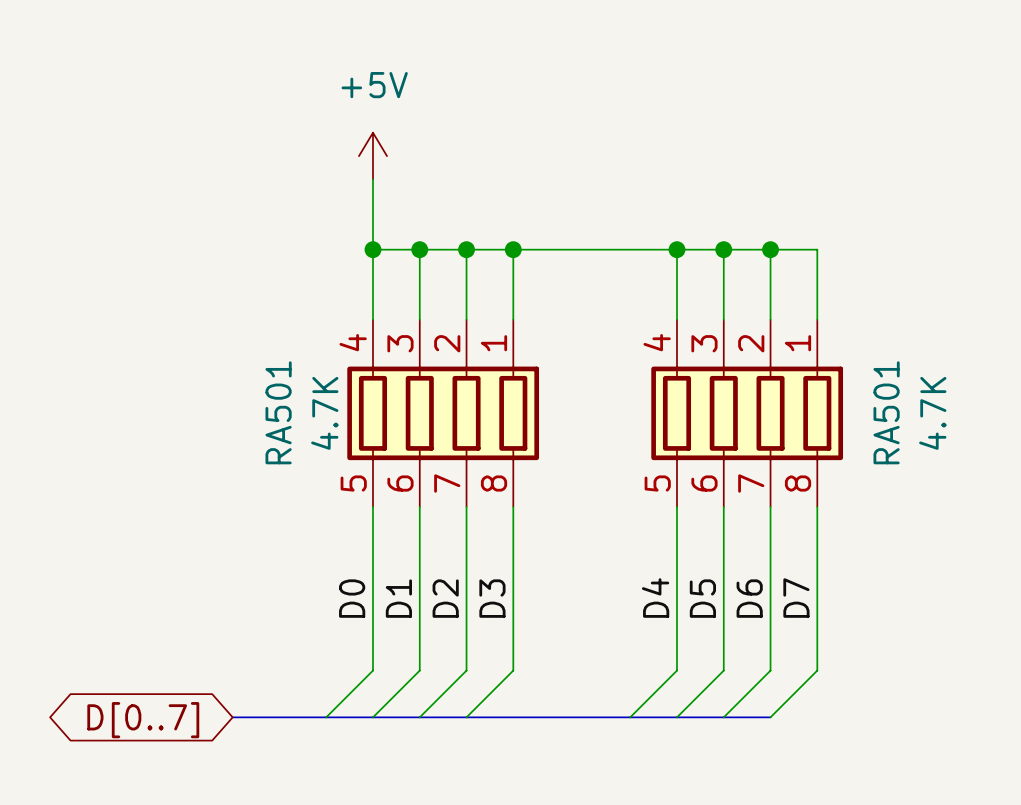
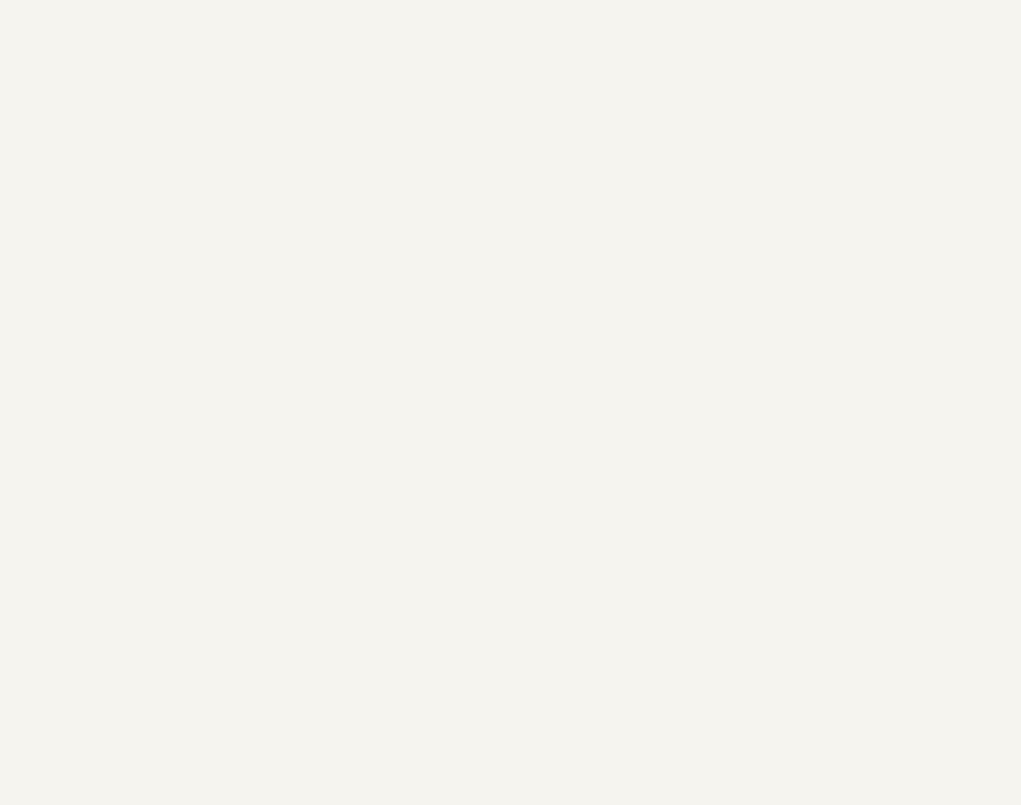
power symbol: +5V (373, 156) -> none
wire: (373, 179) (373, 319) -> none
wire: (373, 249) (817, 249) (817, 319) -> none
junction: (373, 249) -> none
wire: (419, 249) (419, 319) -> none
junction: (419, 249) -> none
wire: (466, 249) (466, 319) -> none
junction: (466, 249) -> none
wire: (513, 249) (513, 319) -> none
junction: (513, 249) -> none
wire: (677, 249) (677, 319) -> none
junction: (677, 249) -> none
wire: (723, 249) (723, 319) -> none
junction: (723, 249) -> none
wire: (770, 249) (770, 319) -> none
junction: (770, 249) -> none
RA501: 4.7K (443, 413) -> none
RA501: 4.7K (747, 413) -> none
wire: (373, 506) (373, 670) (326, 717) -> none
wire: (419, 506) (419, 670) (373, 717) -> none
wire: (466, 506) (466, 670) (419, 717) -> none
wire: (513, 506) (513, 670) (466, 717) -> none
wire: (677, 506) (677, 670) (630, 717) -> none
wire: (723, 506) (723, 670) (677, 717) -> none
wire: (770, 506) (770, 670) (723, 717) -> none
wire: (817, 506) (817, 670) (770, 717) -> none
label: D0 (352, 598) -> none
label: D1 (398, 598) -> none
label: D2 (445, 598) -> none
label: D3 (492, 598) -> none
label: D4 (655, 598) -> none
label: D5 (702, 598) -> none
label: D6 (749, 598) -> none
label: D7 (796, 598) -> none
bus: (232, 717) (770, 717) -> none
global label: D[0..7] (143, 720) -> none

